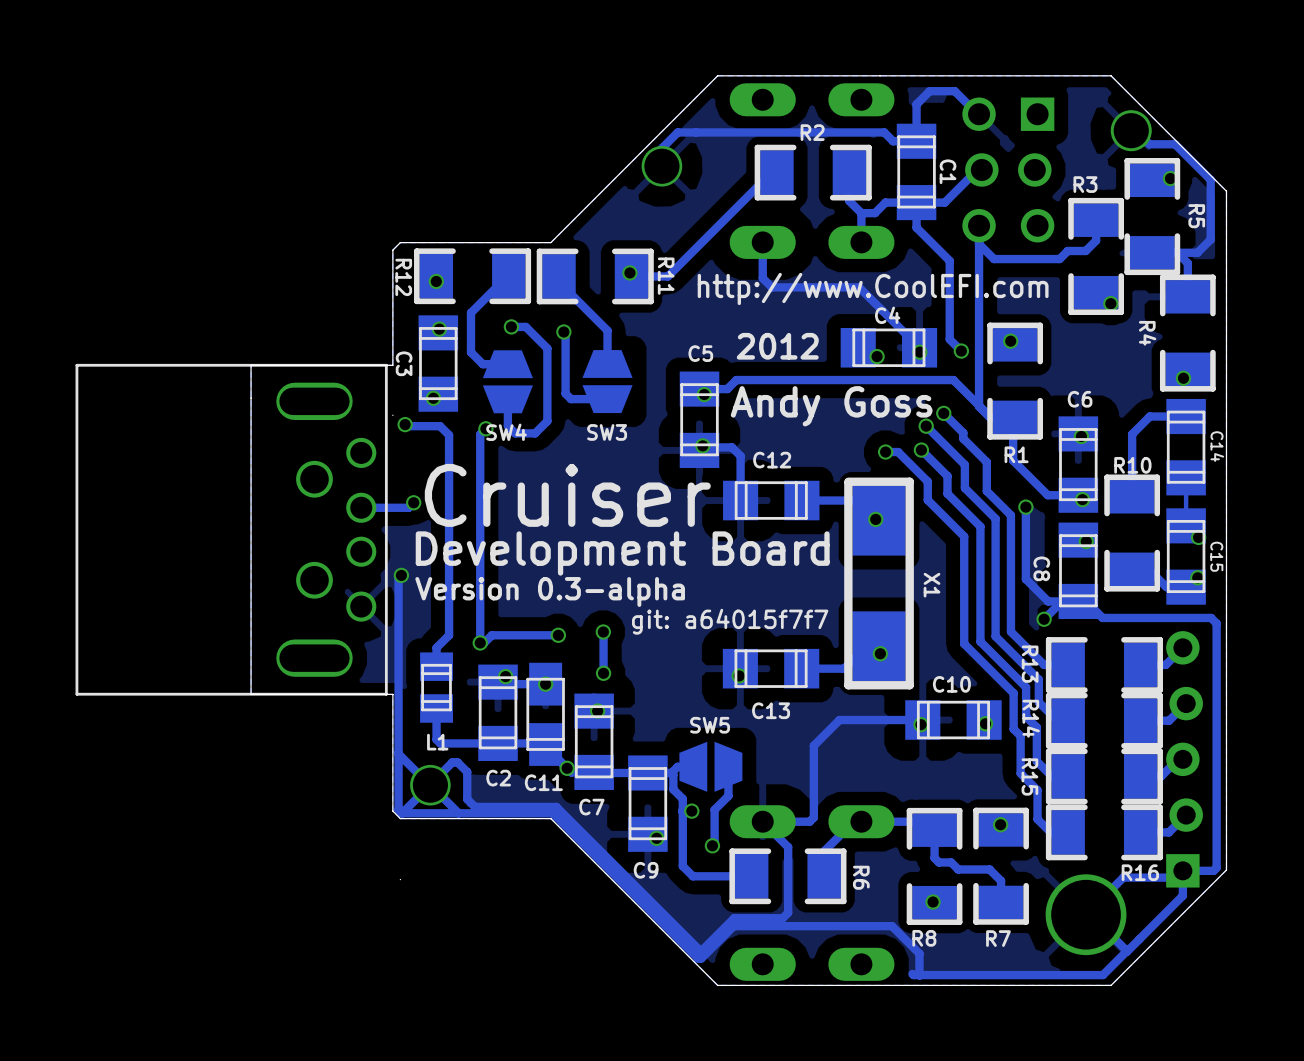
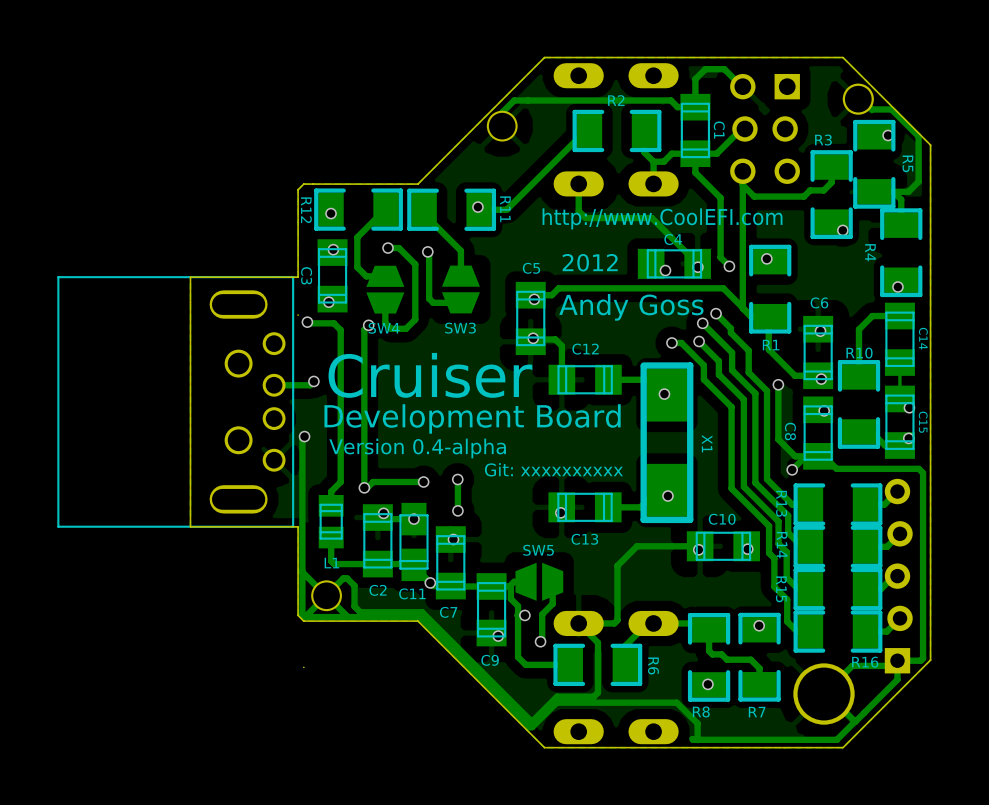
text: Version 0.3-alpha (550, 591) -> Version 0.4-alpha (417, 448)
text: git: a64015f7f7 (730, 621) -> Git: xxxxxxxxxx (553, 469)

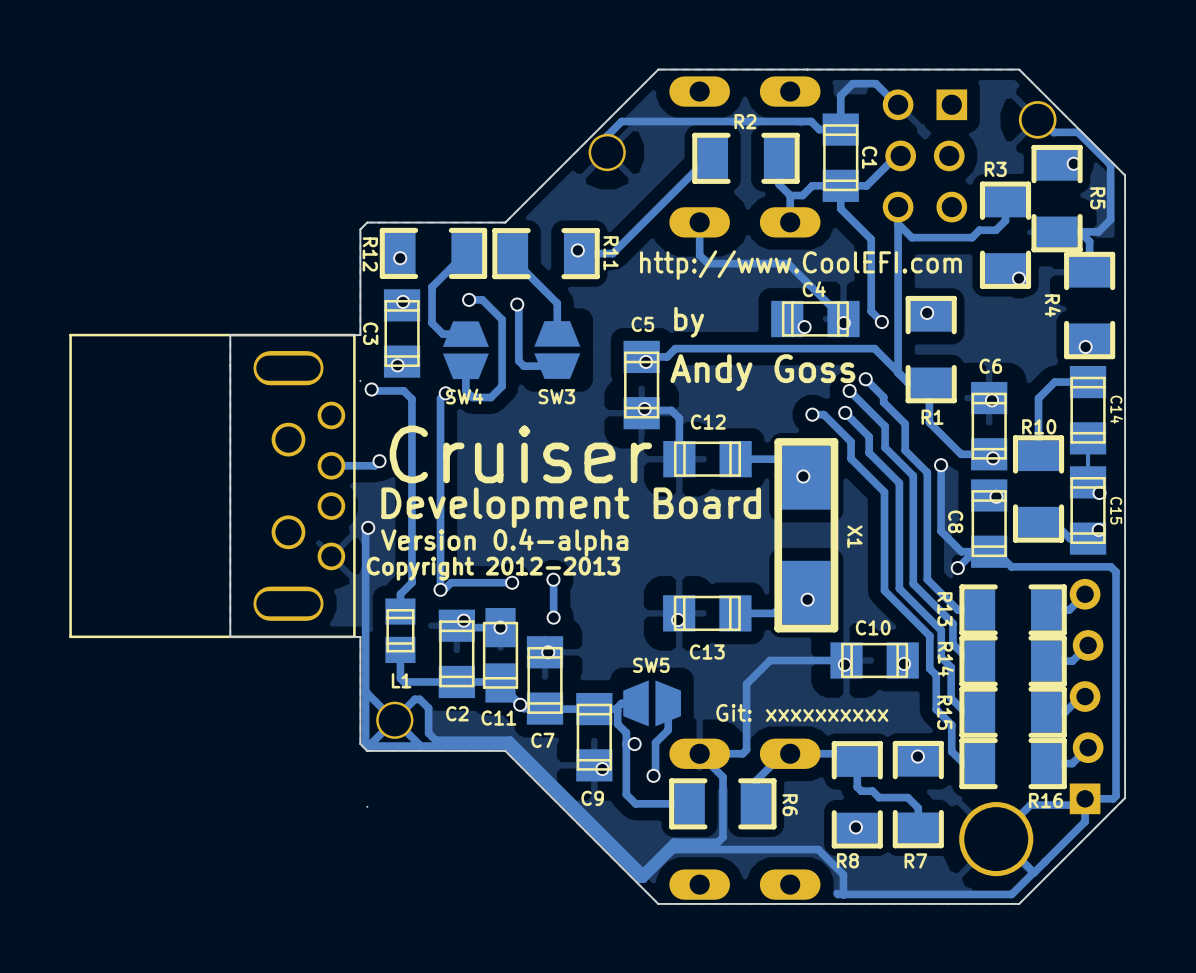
text: 2012 (590, 262) -> none
text: none -> by (689, 322)
text: none -> Copyright 2012-2013 (493, 568)
text position: Git: xxxxxxxxxx (553, 469) -> Git: xxxxxxxxxx (802, 712)

